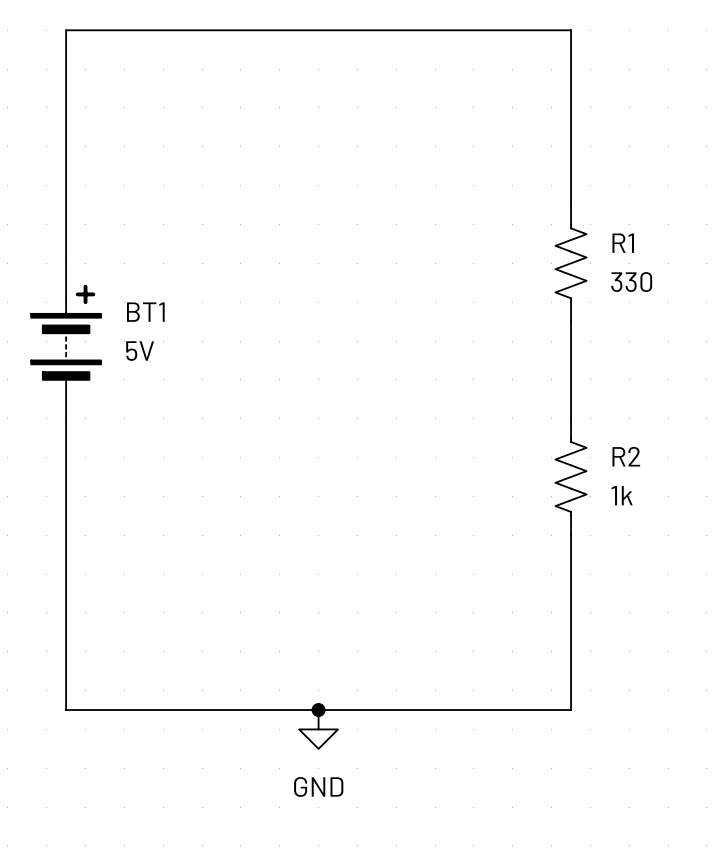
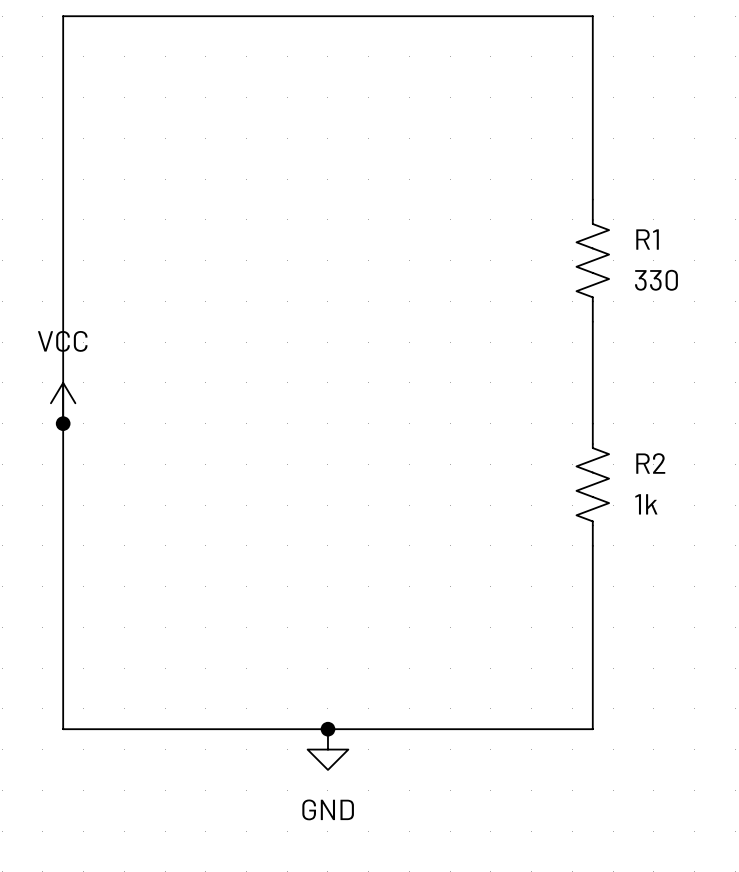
BT1: 5V (66, 341) -> none
power symbol: none -> VCC (63, 403)
junction: none -> (63, 423)

